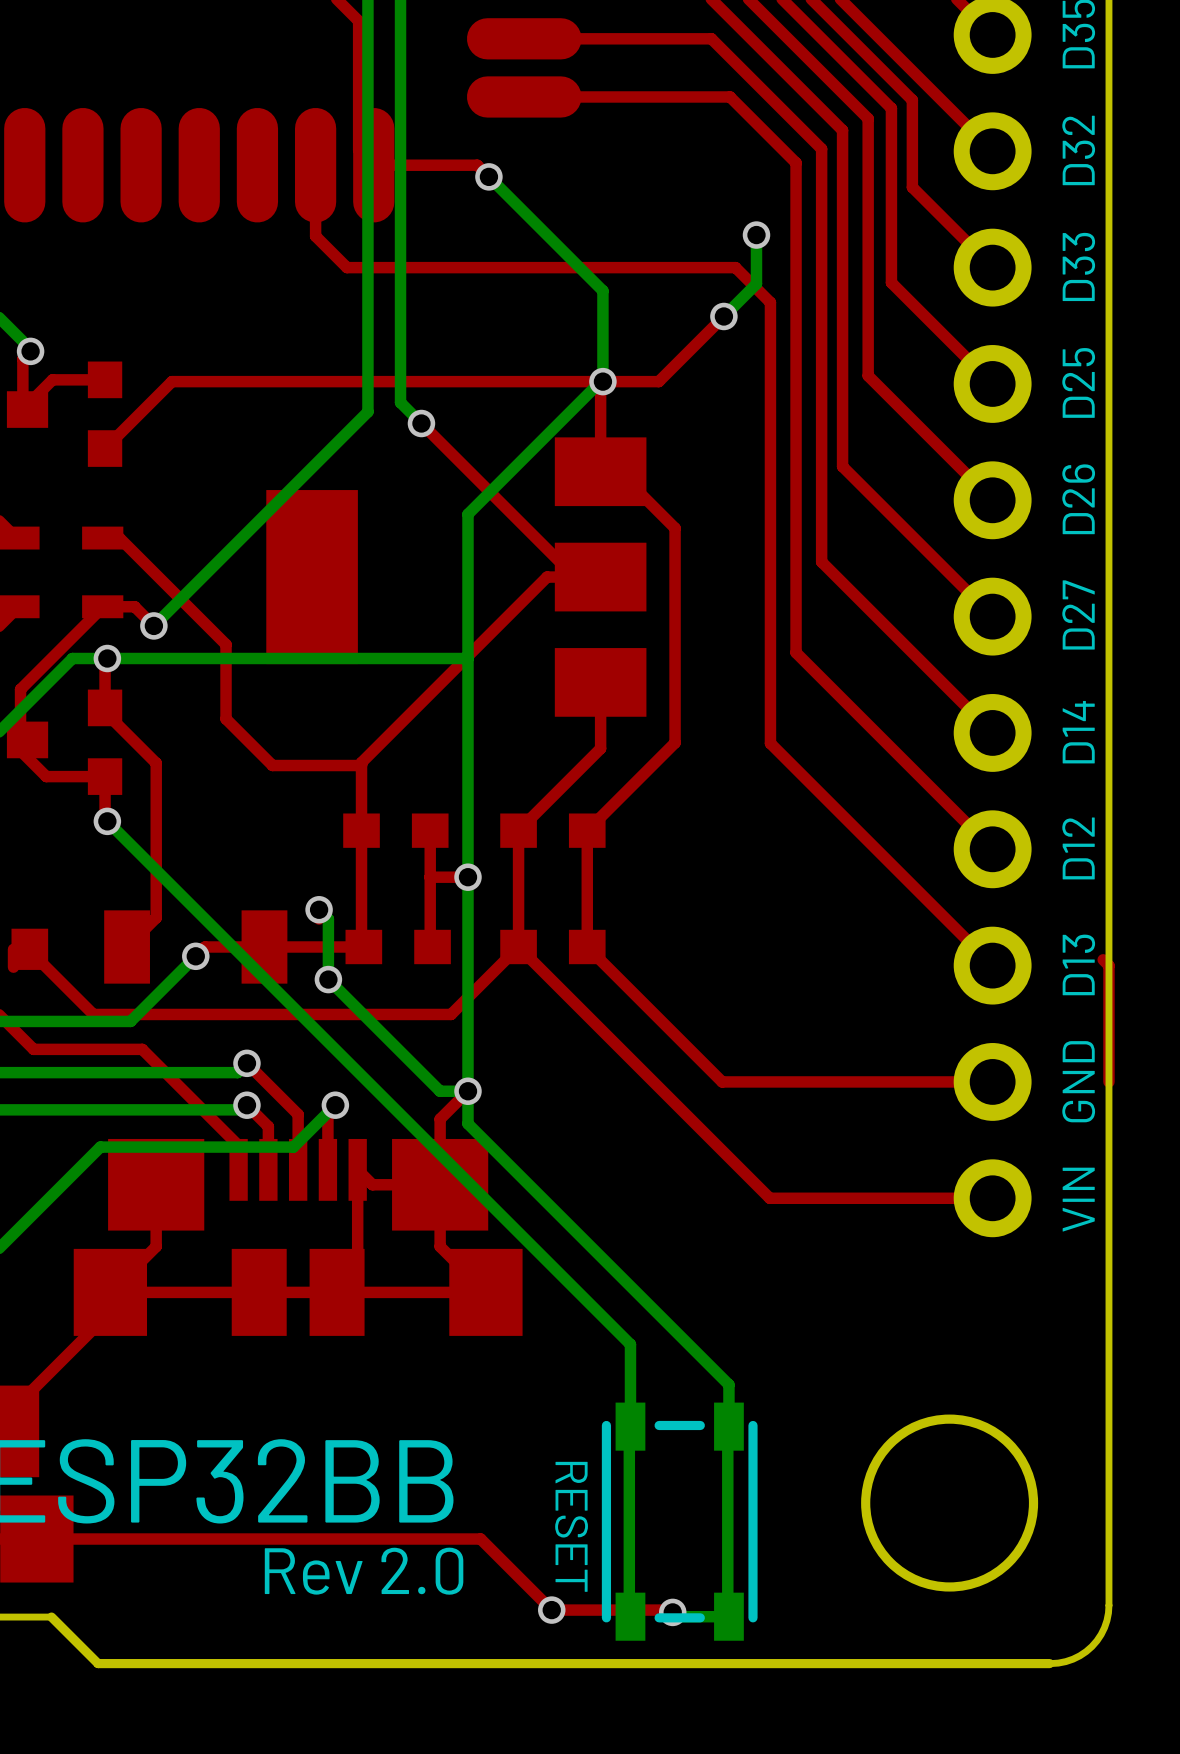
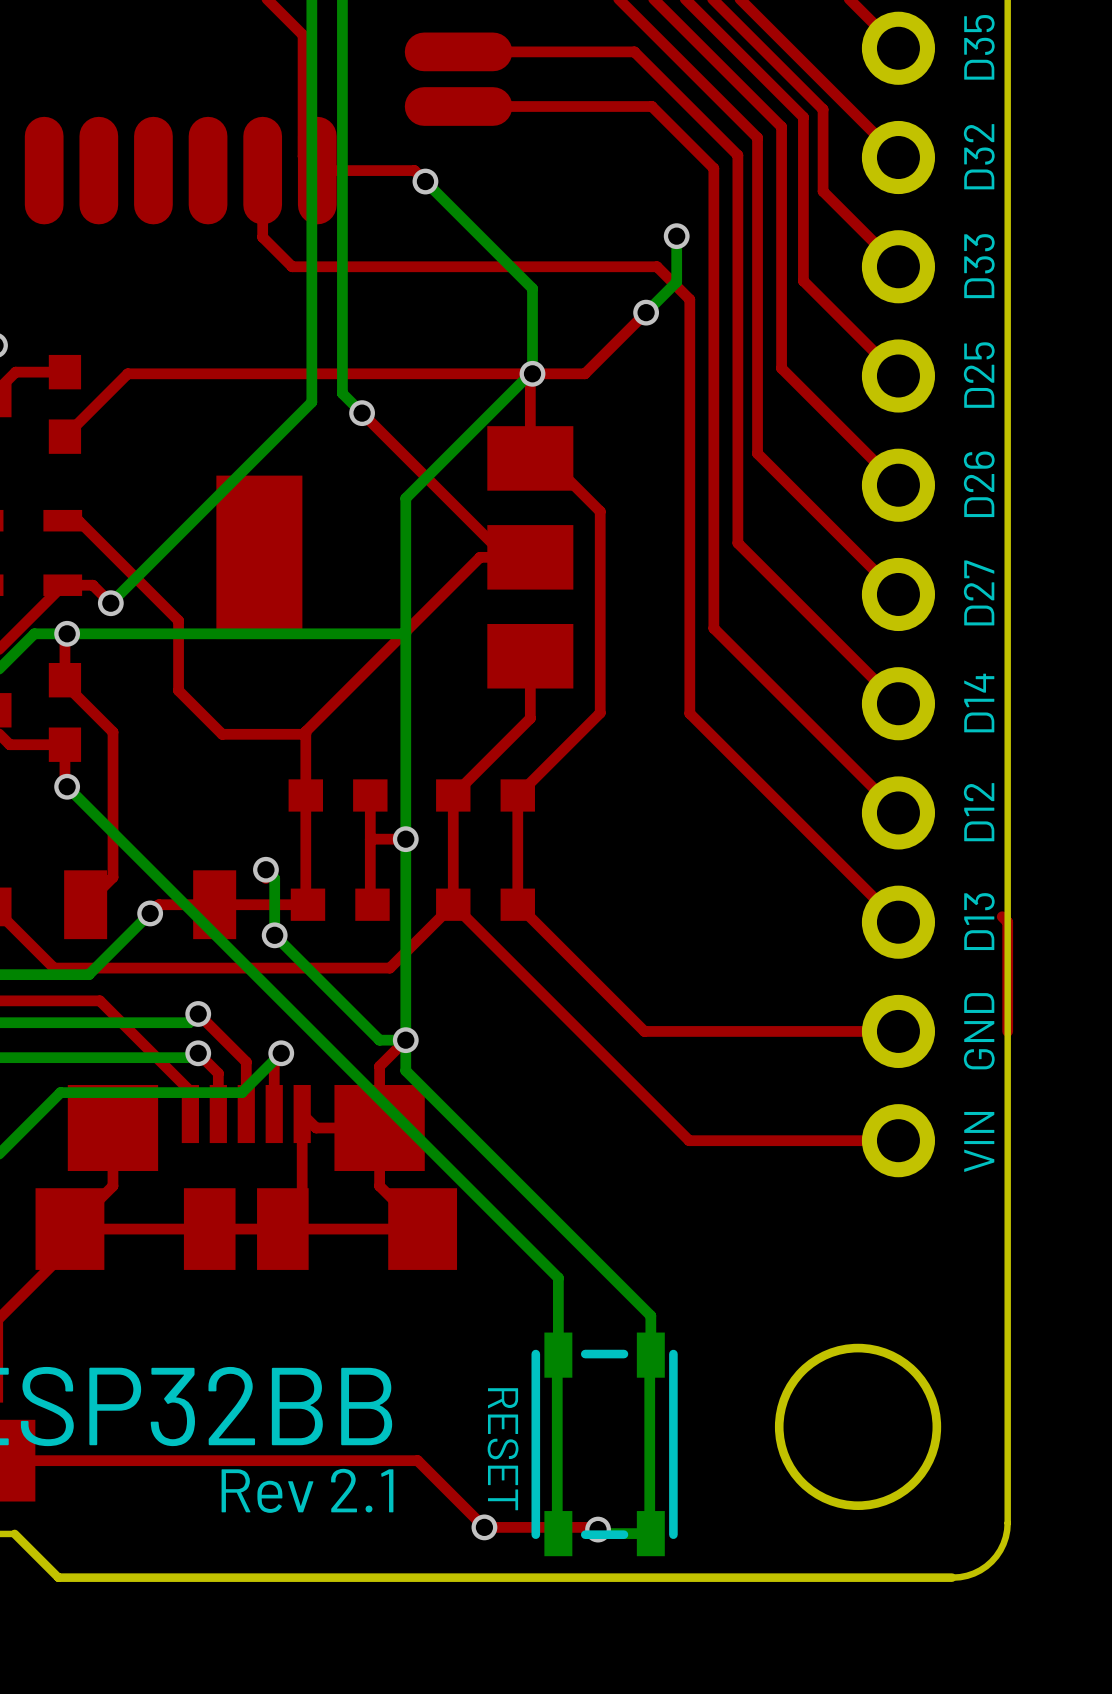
text: Rev 2.0 (364, 1571) -> Rev 2.1 (307, 1490)

